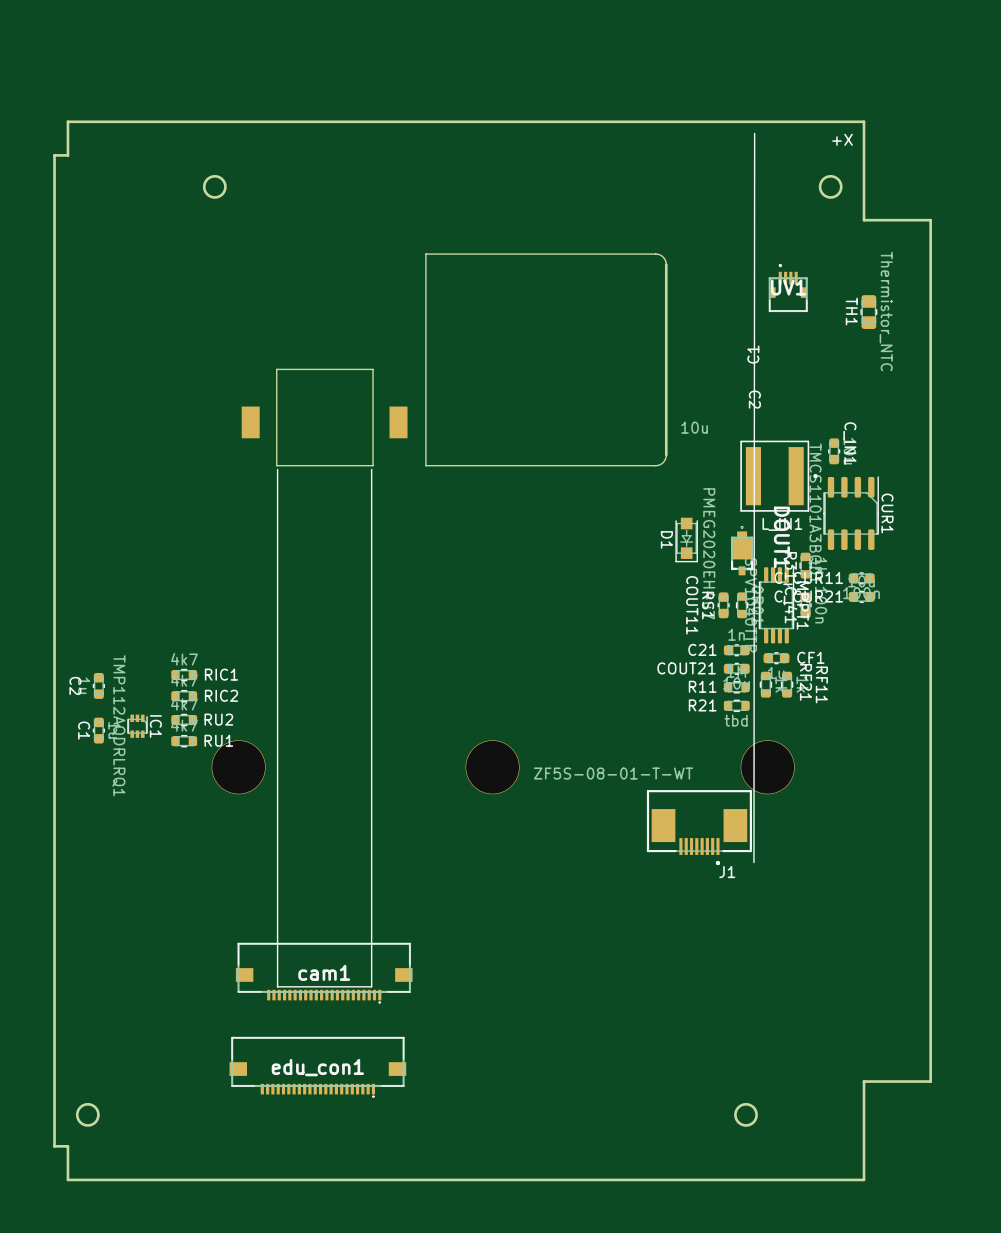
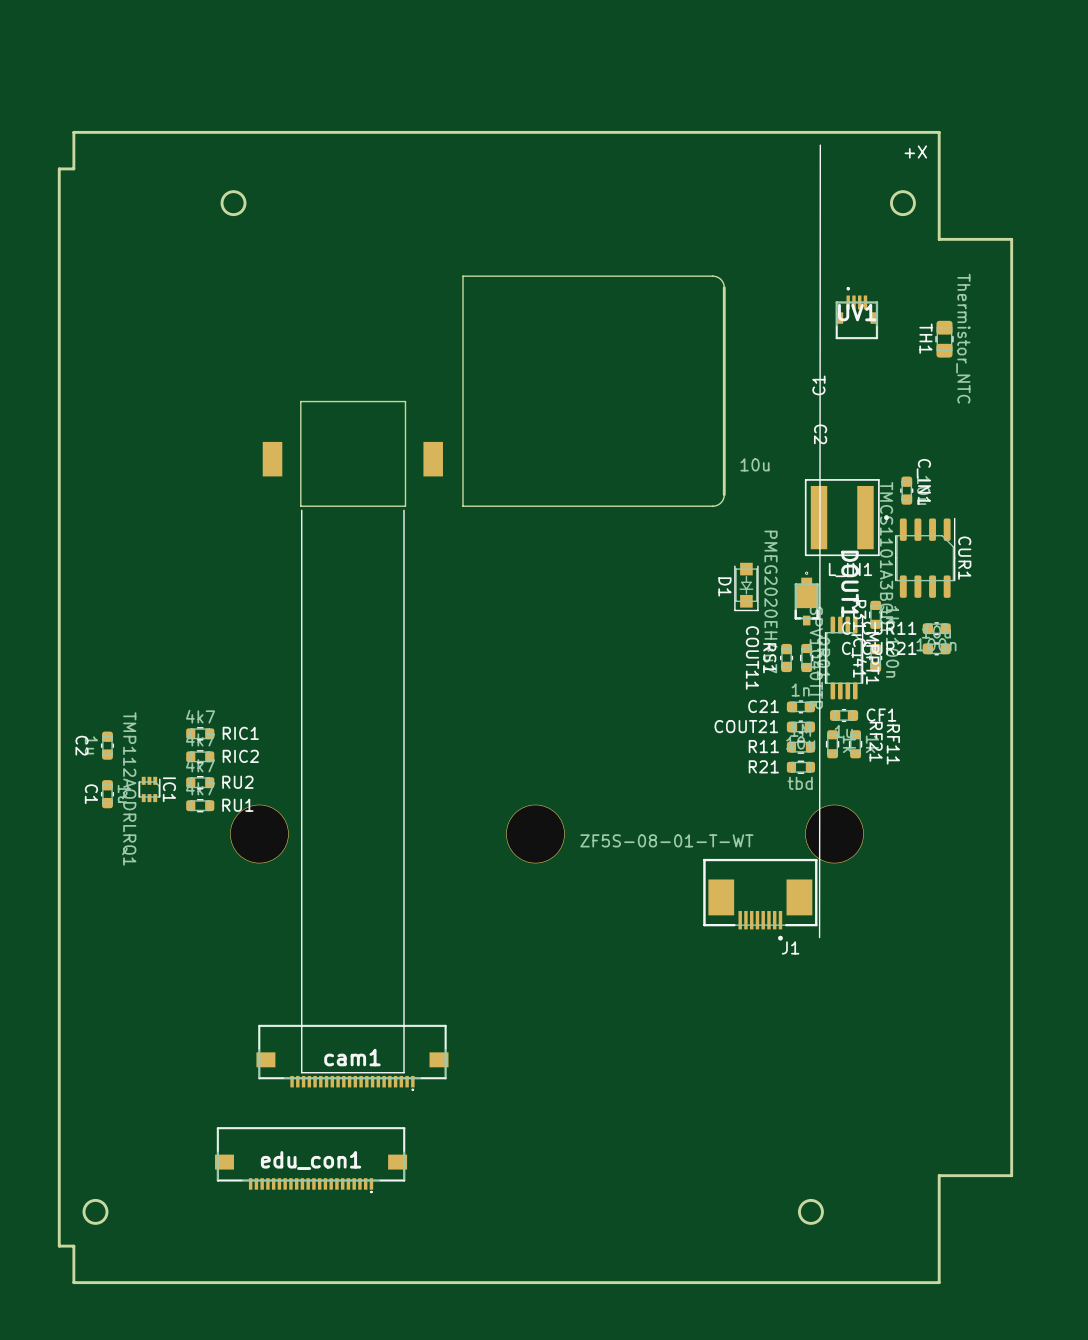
edu_con1 position: (317, 1067) -> (311, 1160)

